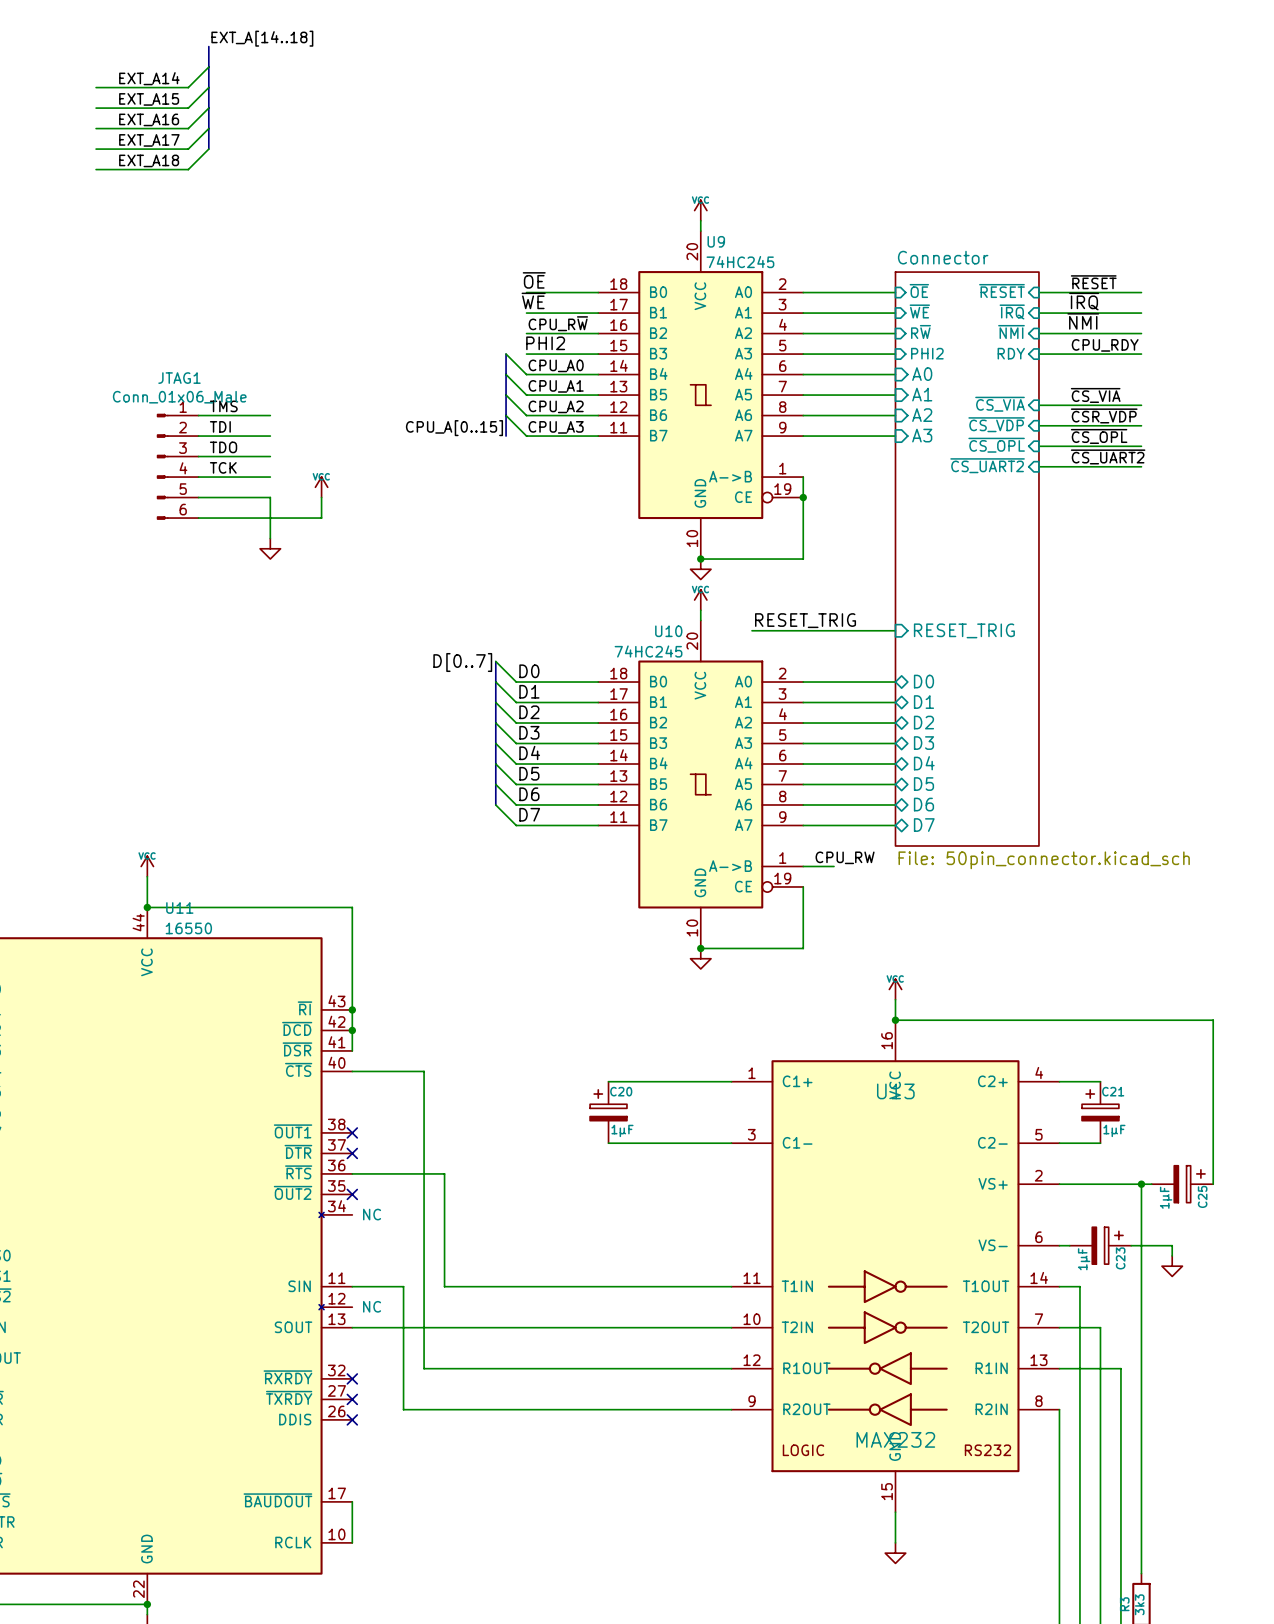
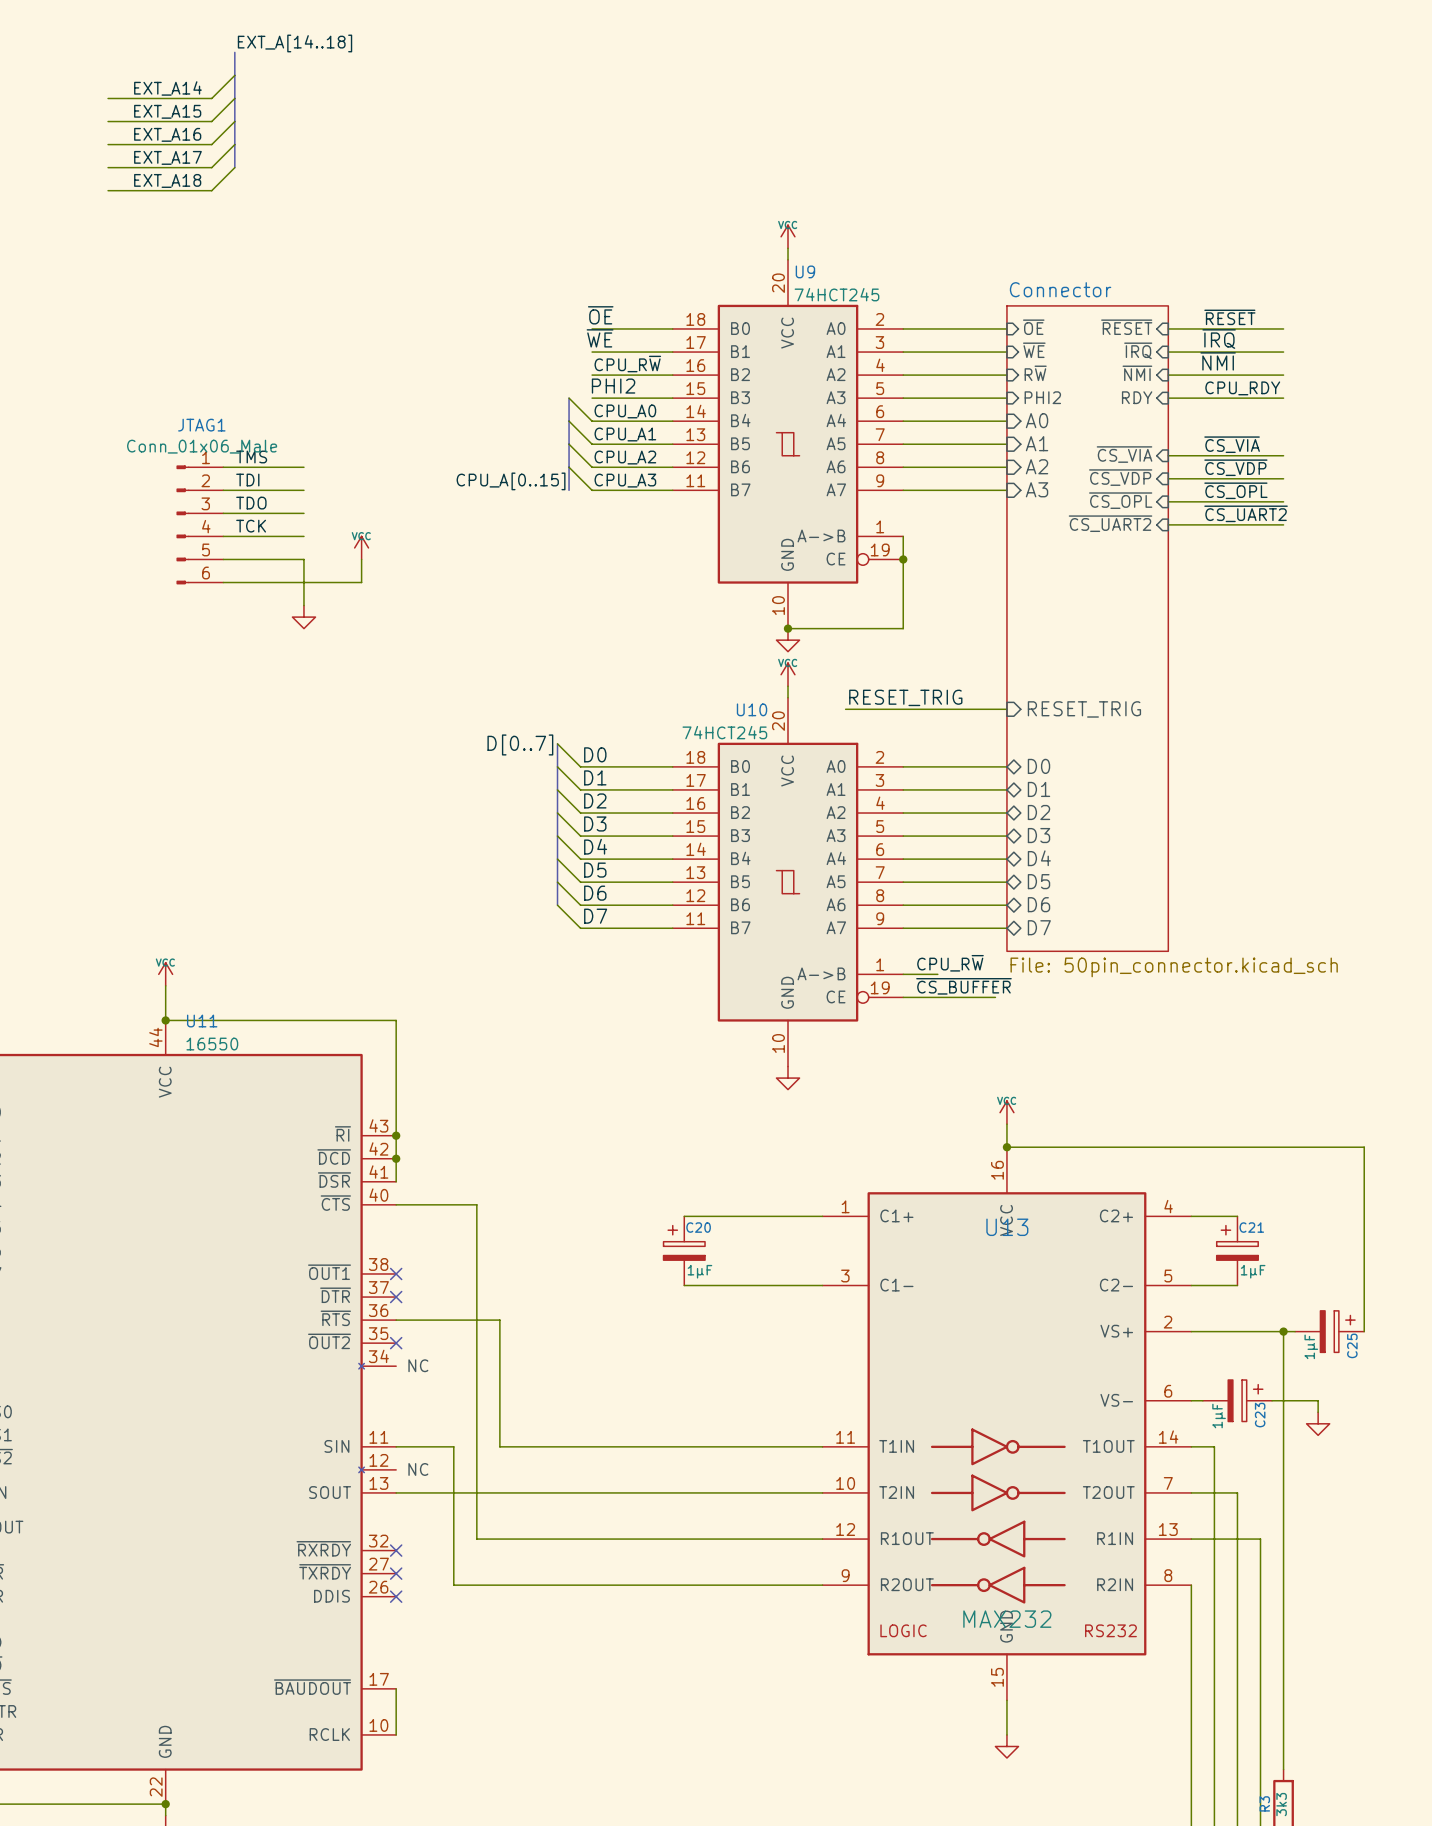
U9 value: 74HC245 (740, 262) -> 74HCT245 (836, 294)
label: ~{CSR_VDP} (1104, 415) -> ~{CS_VDP} (1235, 467)
U10 value: 74HC245 (648, 651) -> 74HCT245 (724, 732)
label: CPU_RW (845, 857) -> CPU_R~{W} (950, 963)
label: none -> ~{CS_BUFFER} (963, 986)
wire: (803, 886) (803, 948) (700, 948) -> (903, 997) (995, 997)
junction: (700, 948) -> none

